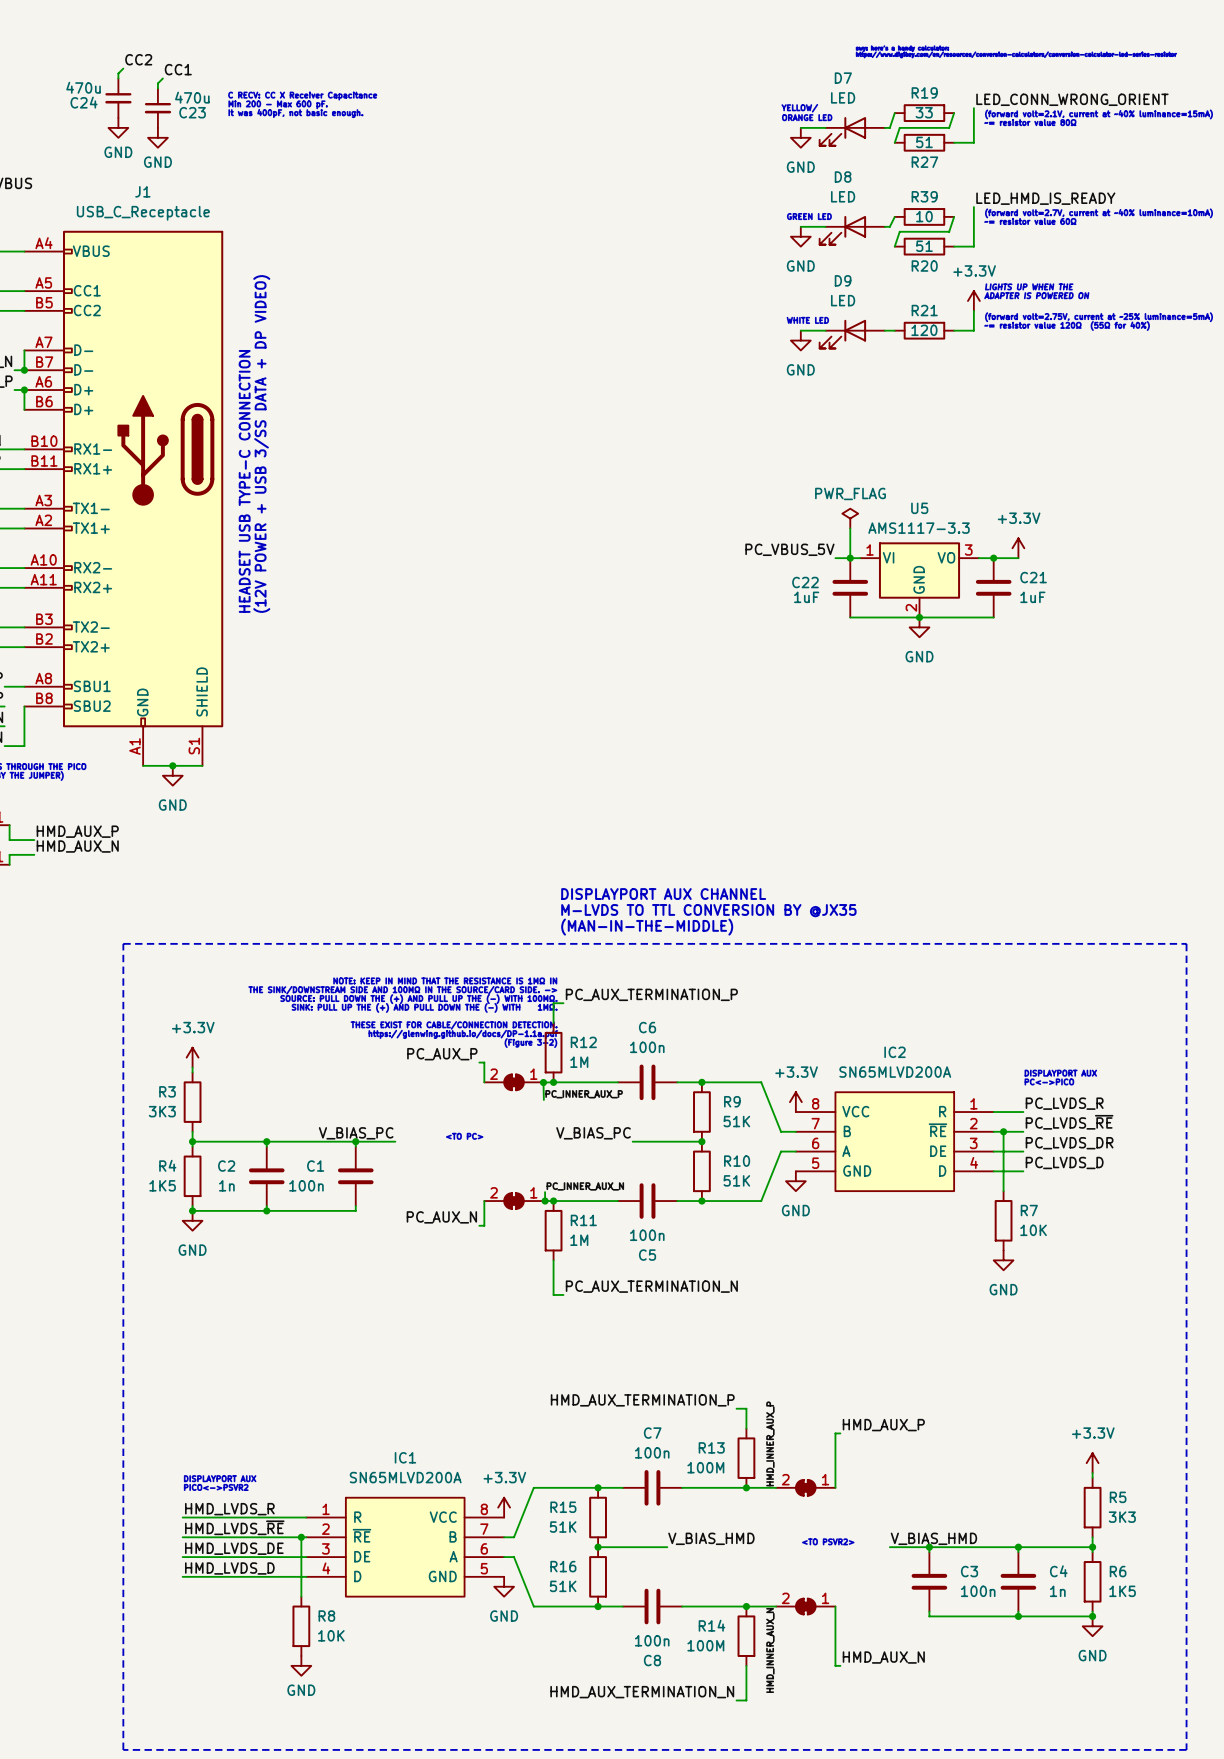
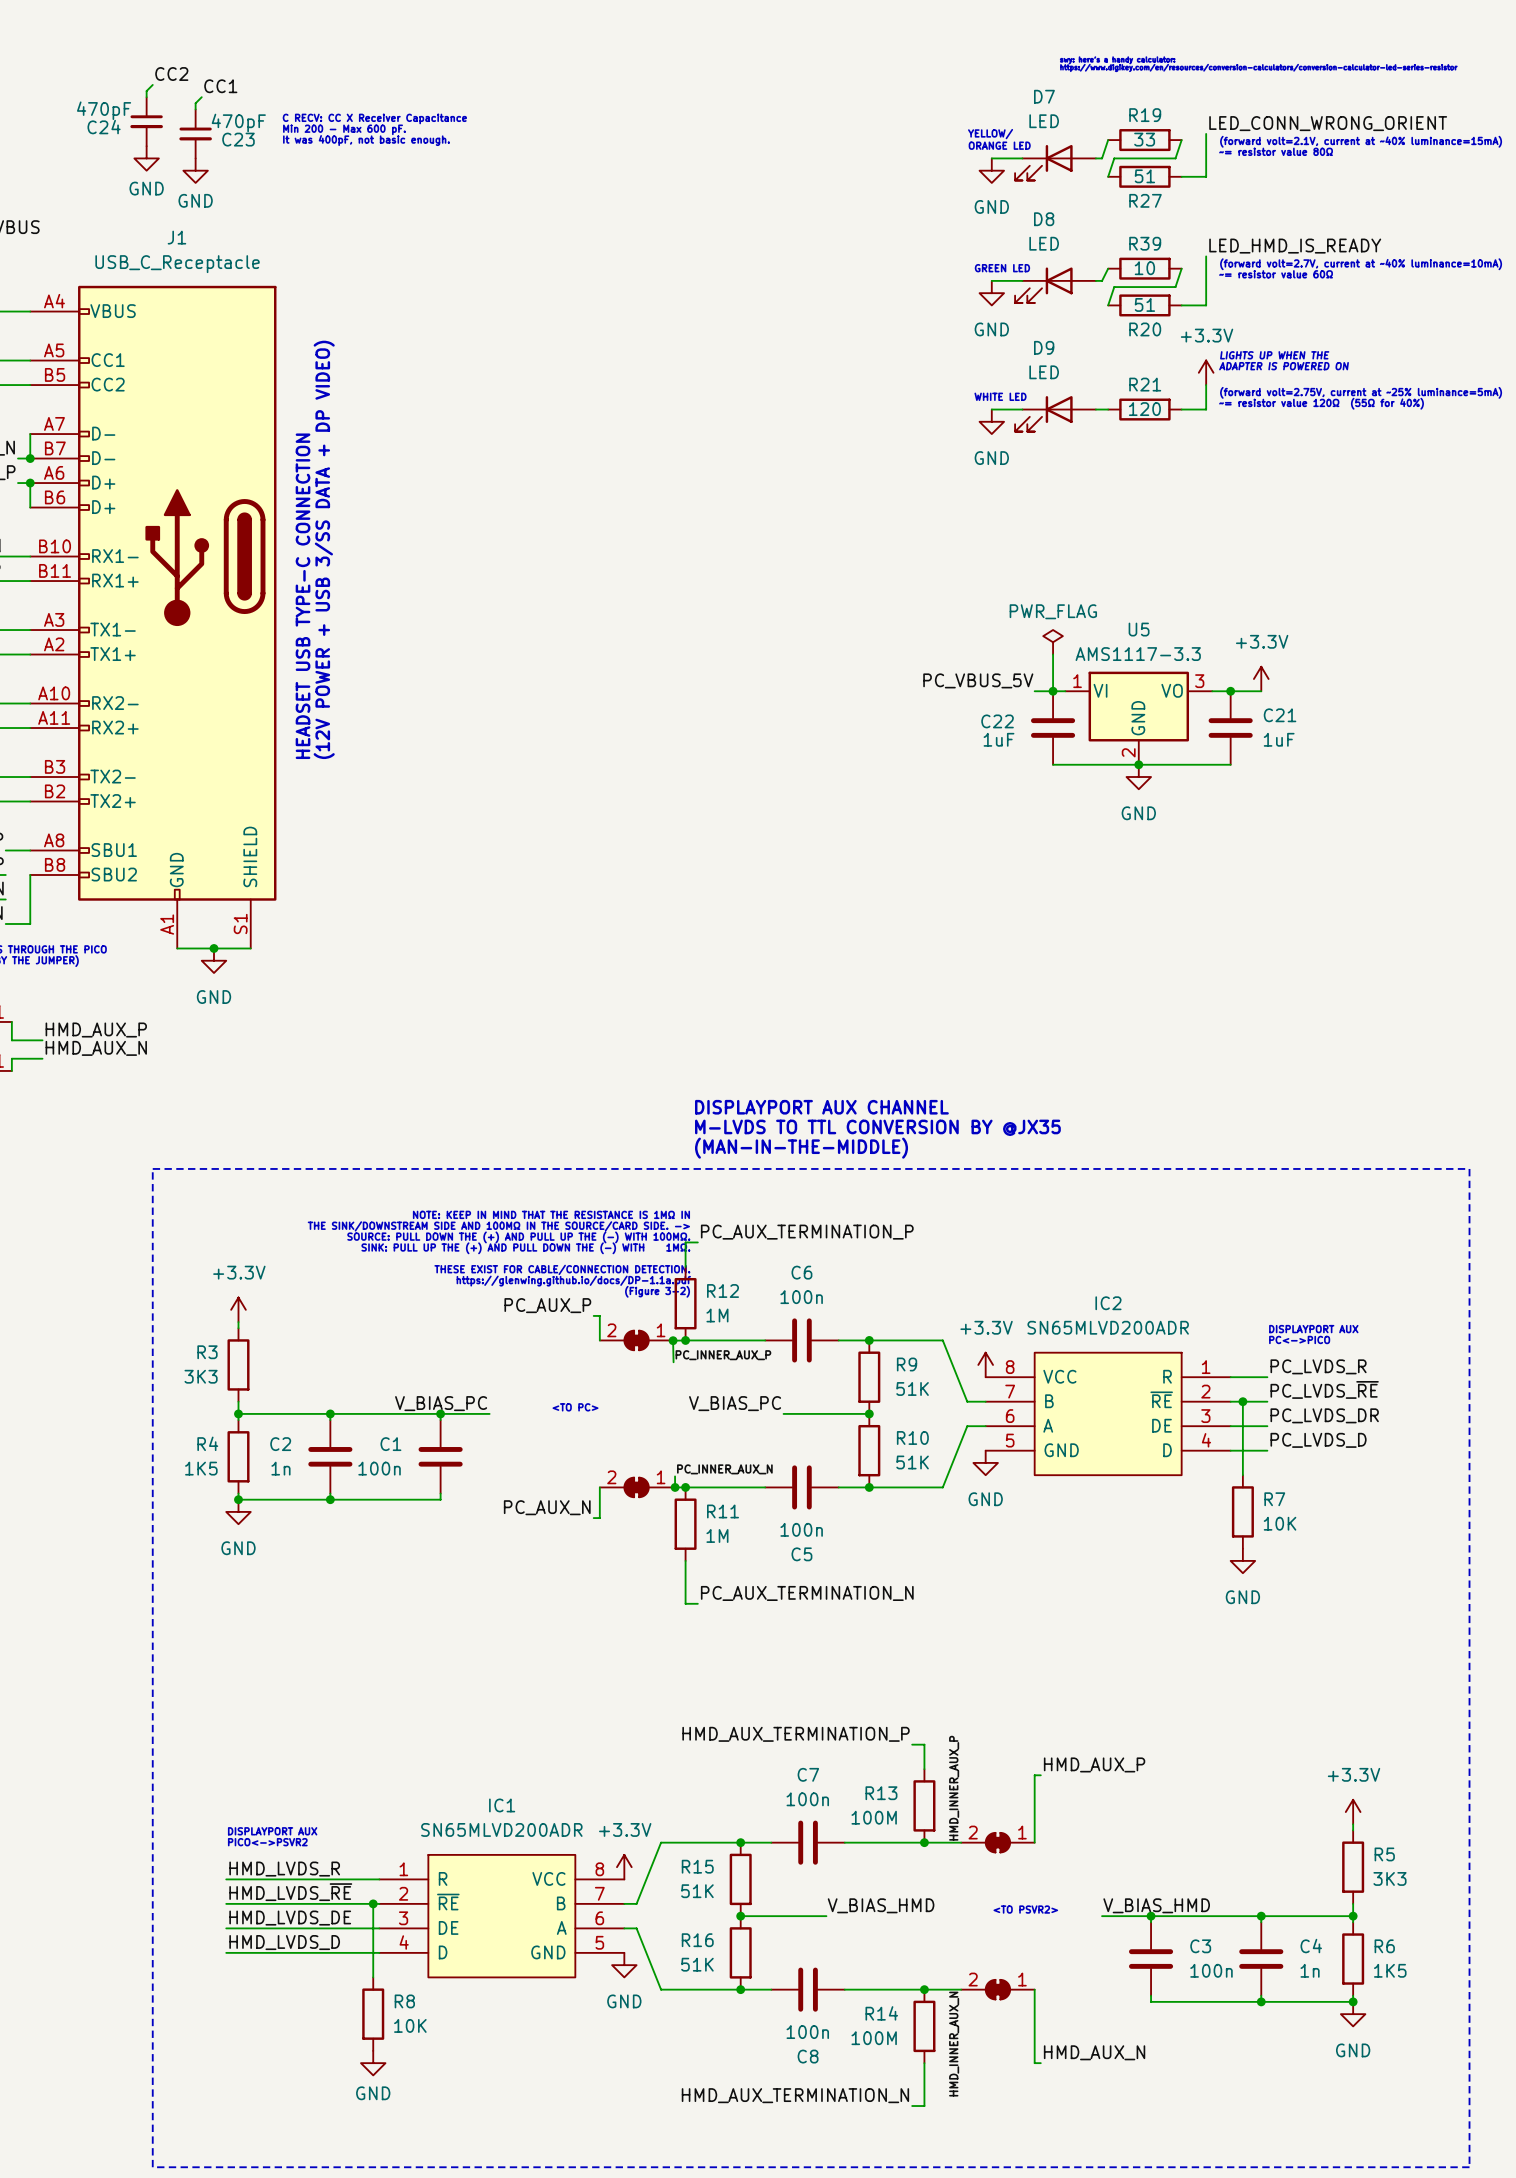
C24 value: 470u (83, 87) -> 470pF (104, 110)
C23 value: 470u (192, 97) -> 470pF (238, 122)
IC2 value: SN65MLVD200A (895, 1072) -> SN65MLVD200ADR (1108, 1327)
IC1 value: SN65MLVD200A (405, 1477) -> SN65MLVD200ADR (501, 1829)

